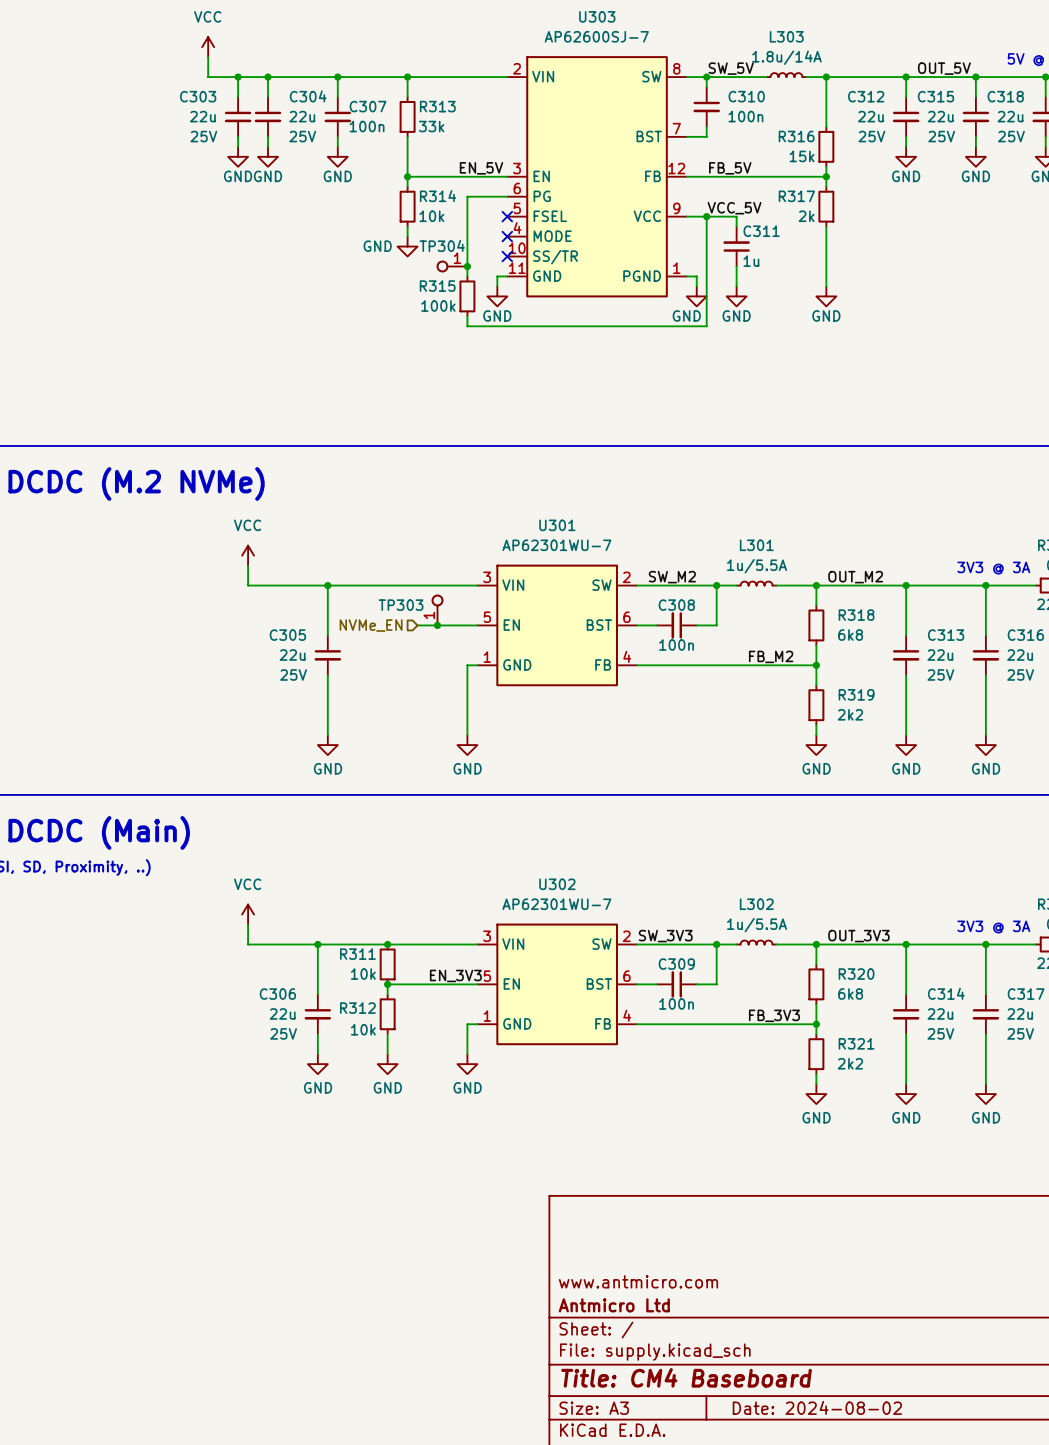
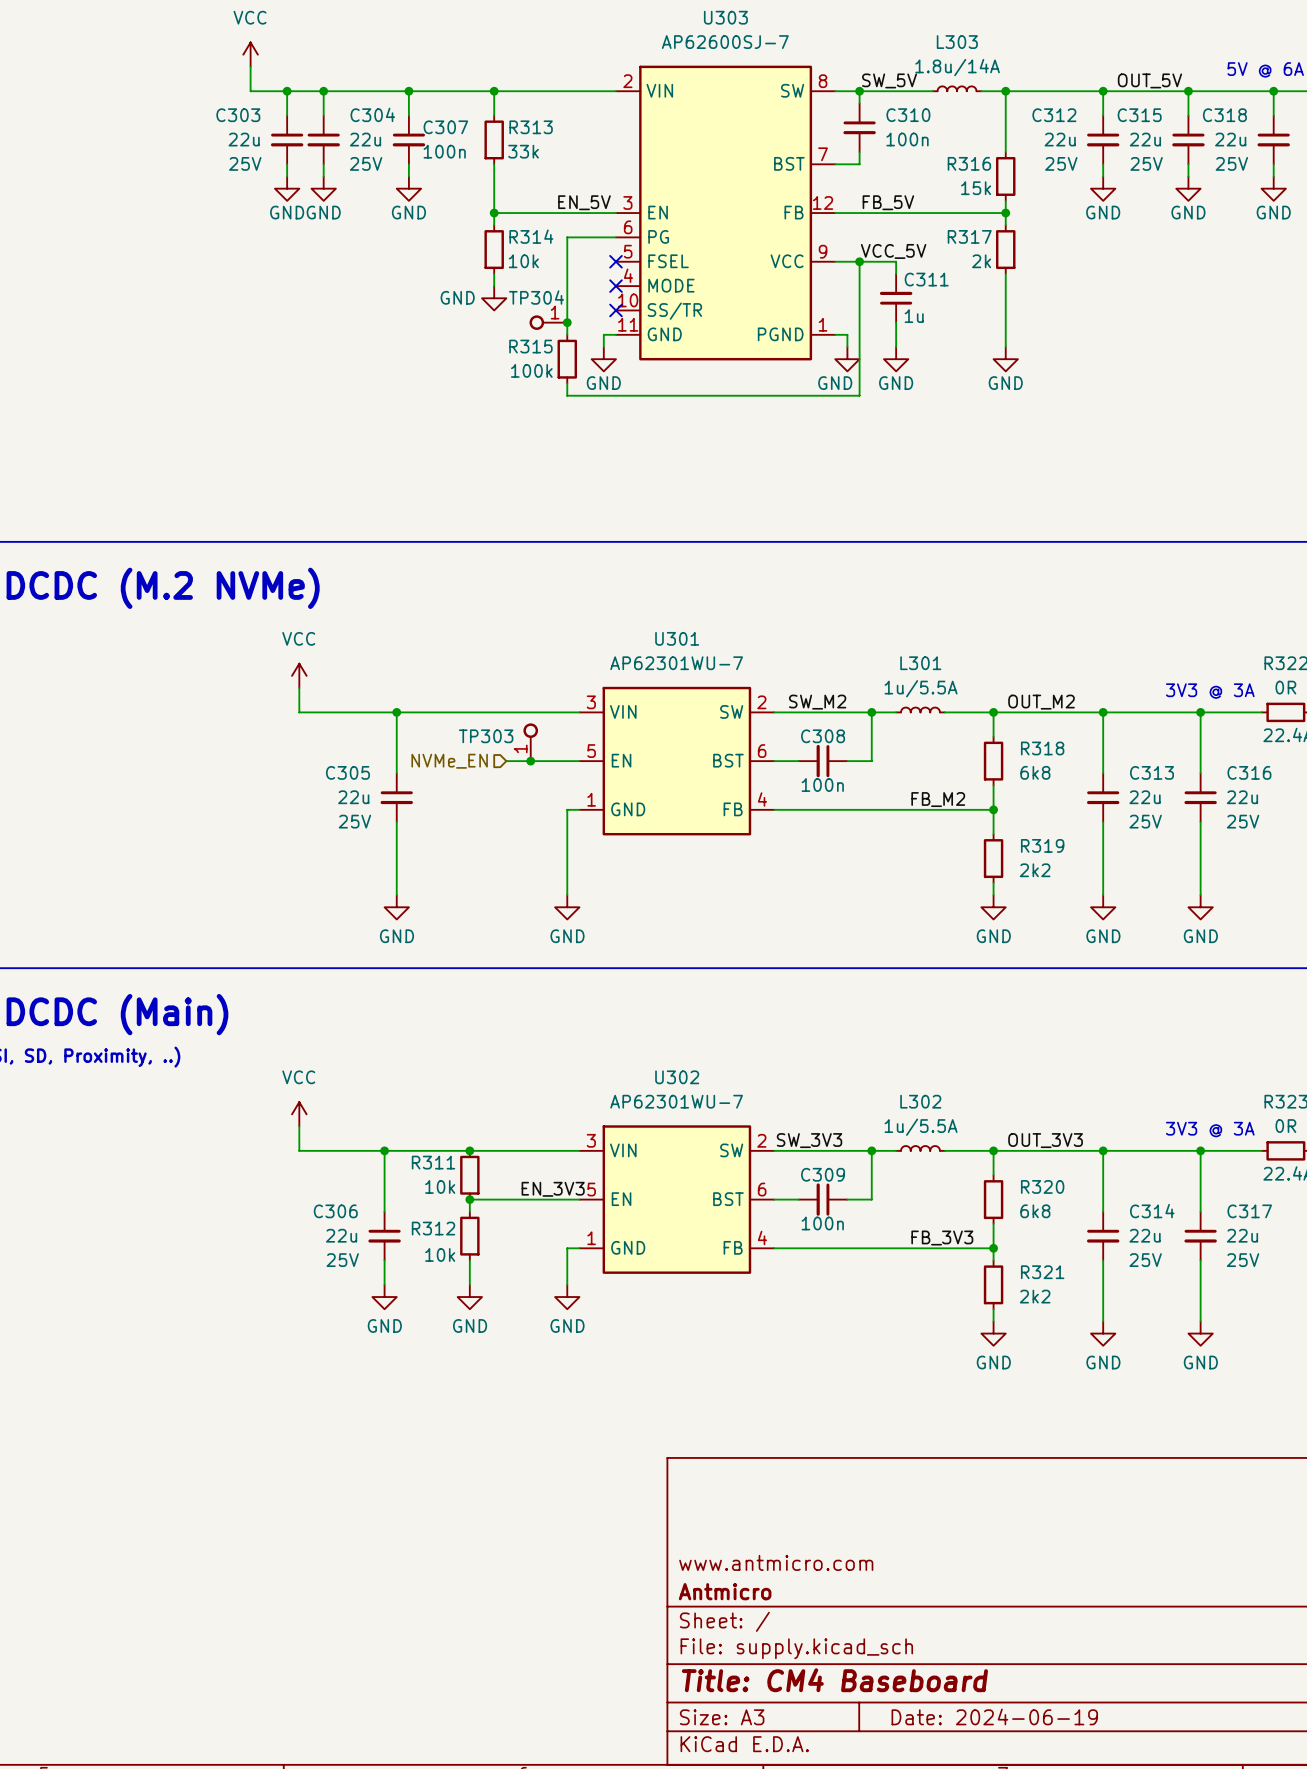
title block: Antmicro Ltd (614, 1305) -> Antmicro (725, 1591)
title block: Date: 2024-08-02 (817, 1407) -> Date: 2024-06-19 (994, 1716)

